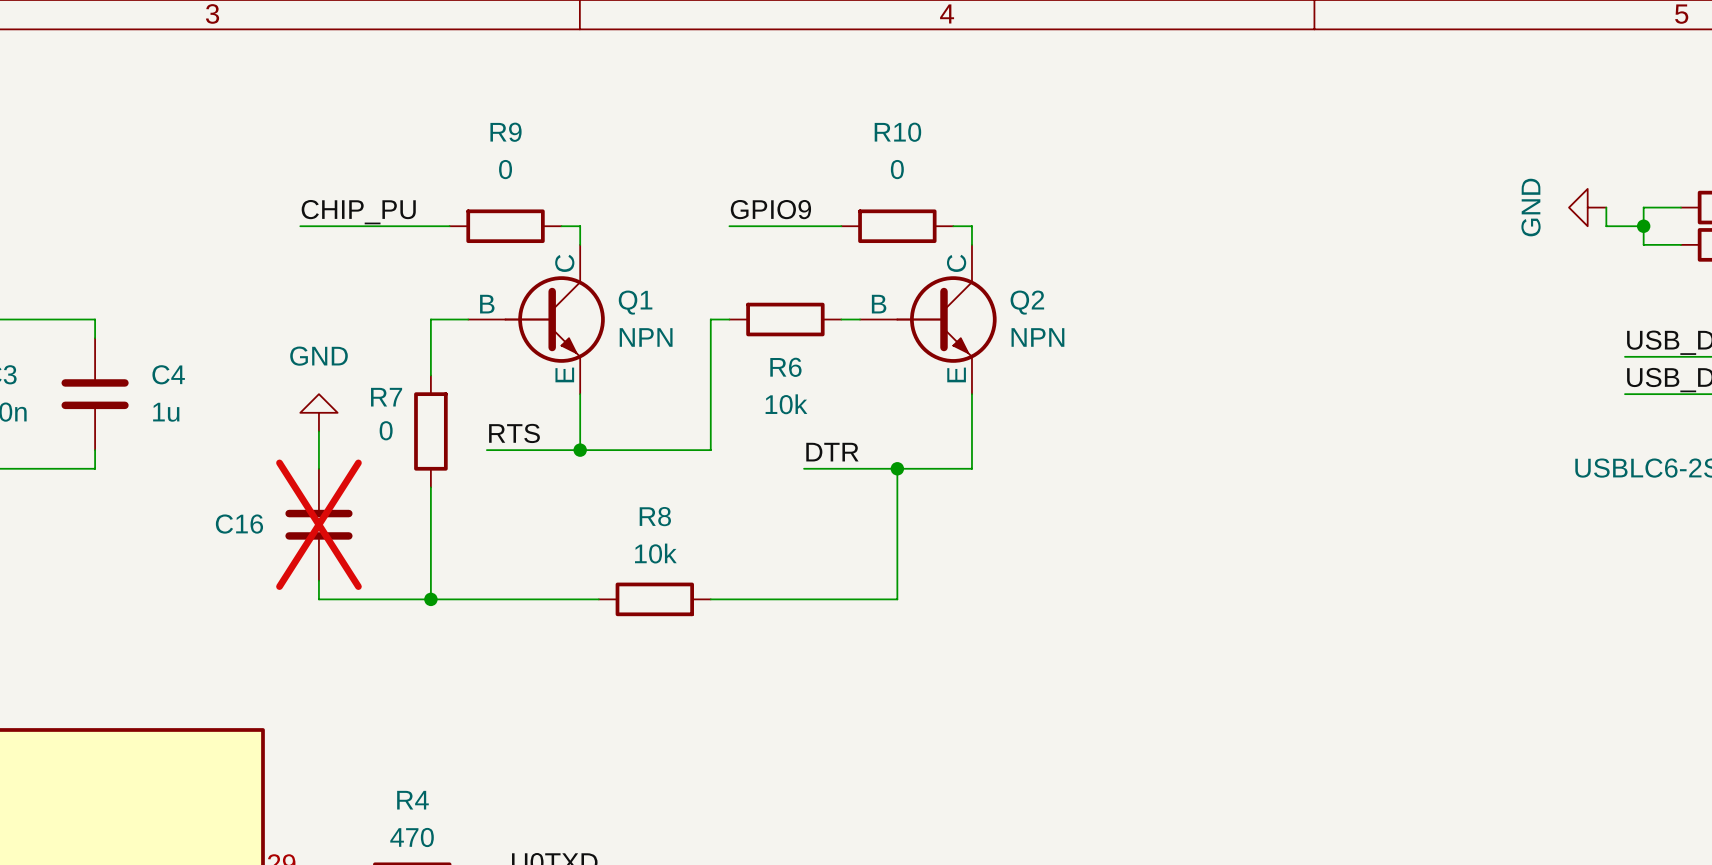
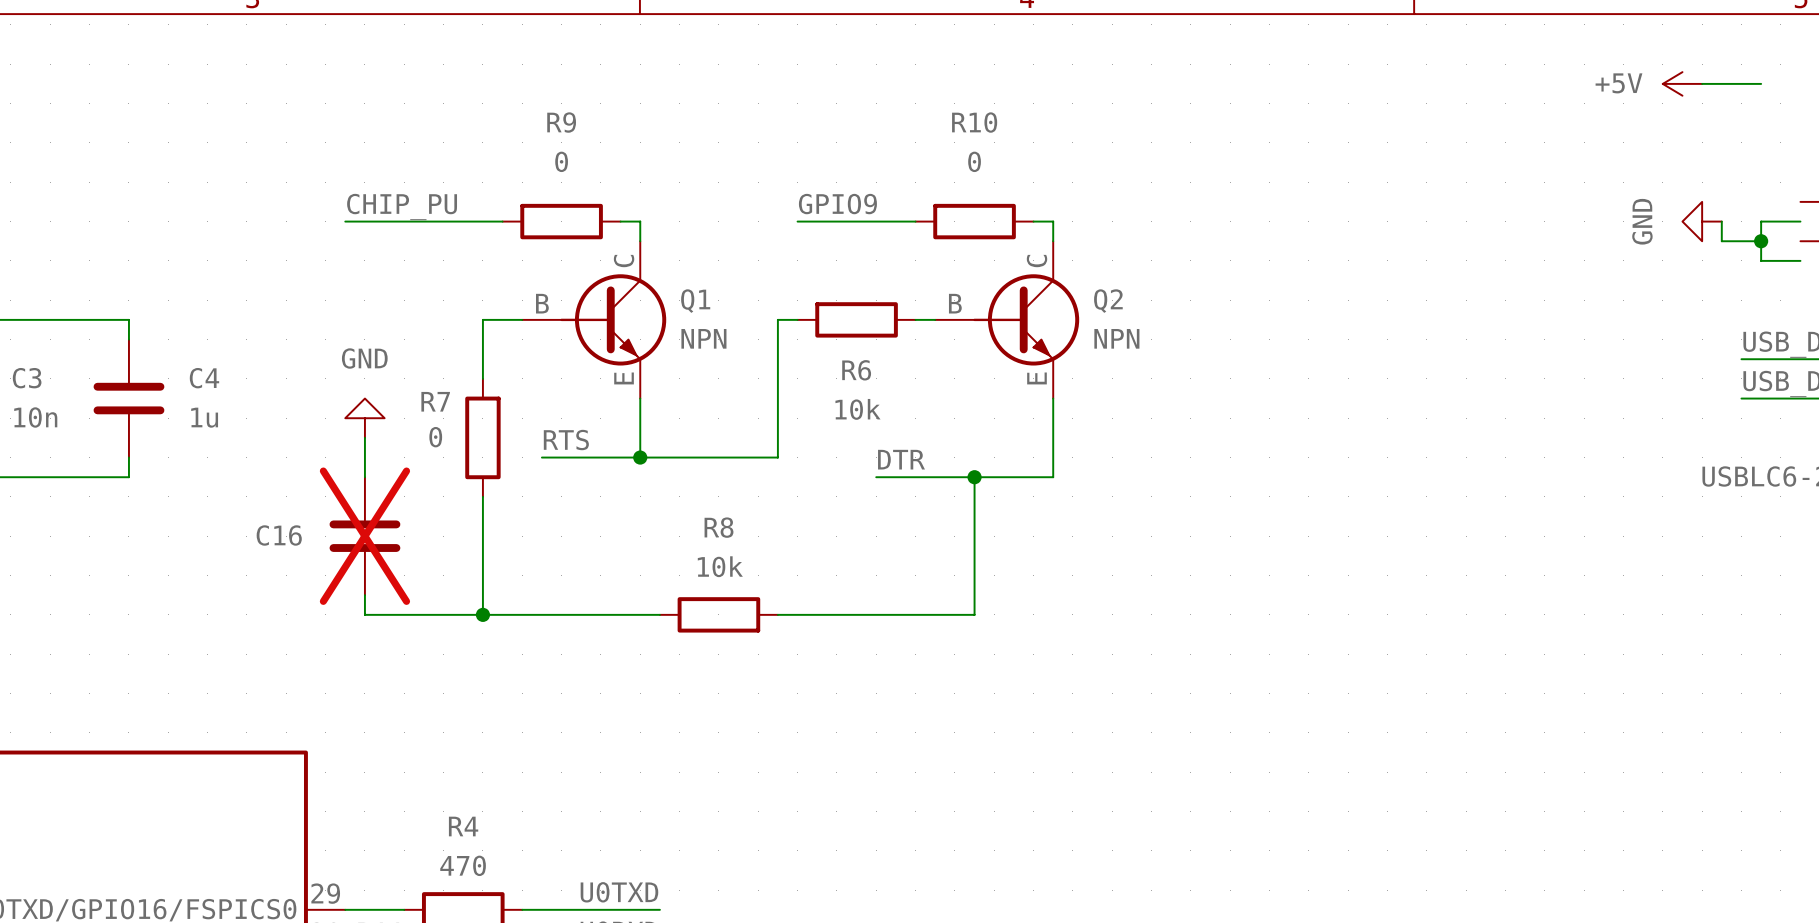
power symbol: none -> +5V (1682, 83)
wire: none -> (1702, 83) (1761, 83)
power symbol position: GND (1587, 207) -> GND (1702, 221)
wire: (1606, 207) (1606, 226) (1643, 226) (1643, 207) (1680, 207) -> none
wire: none -> (1721, 221) (1721, 241) (1761, 241) (1761, 260) (1800, 260)
junction position: (1643, 226) -> (1761, 241)
wire: (1643, 244) (1680, 244) -> (1761, 221) (1800, 221)

